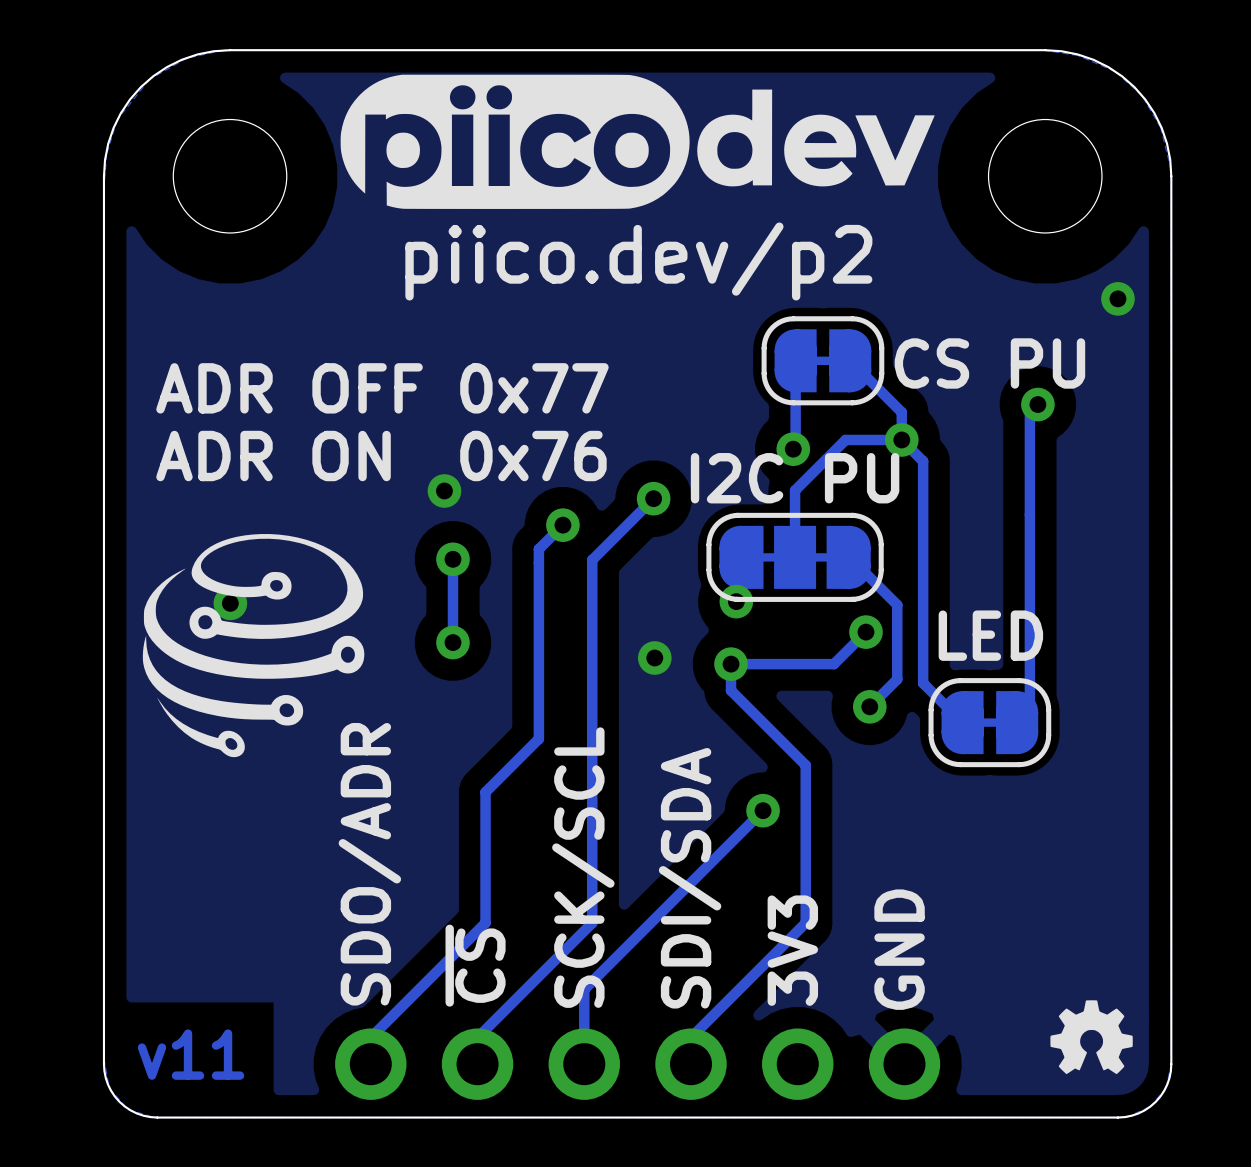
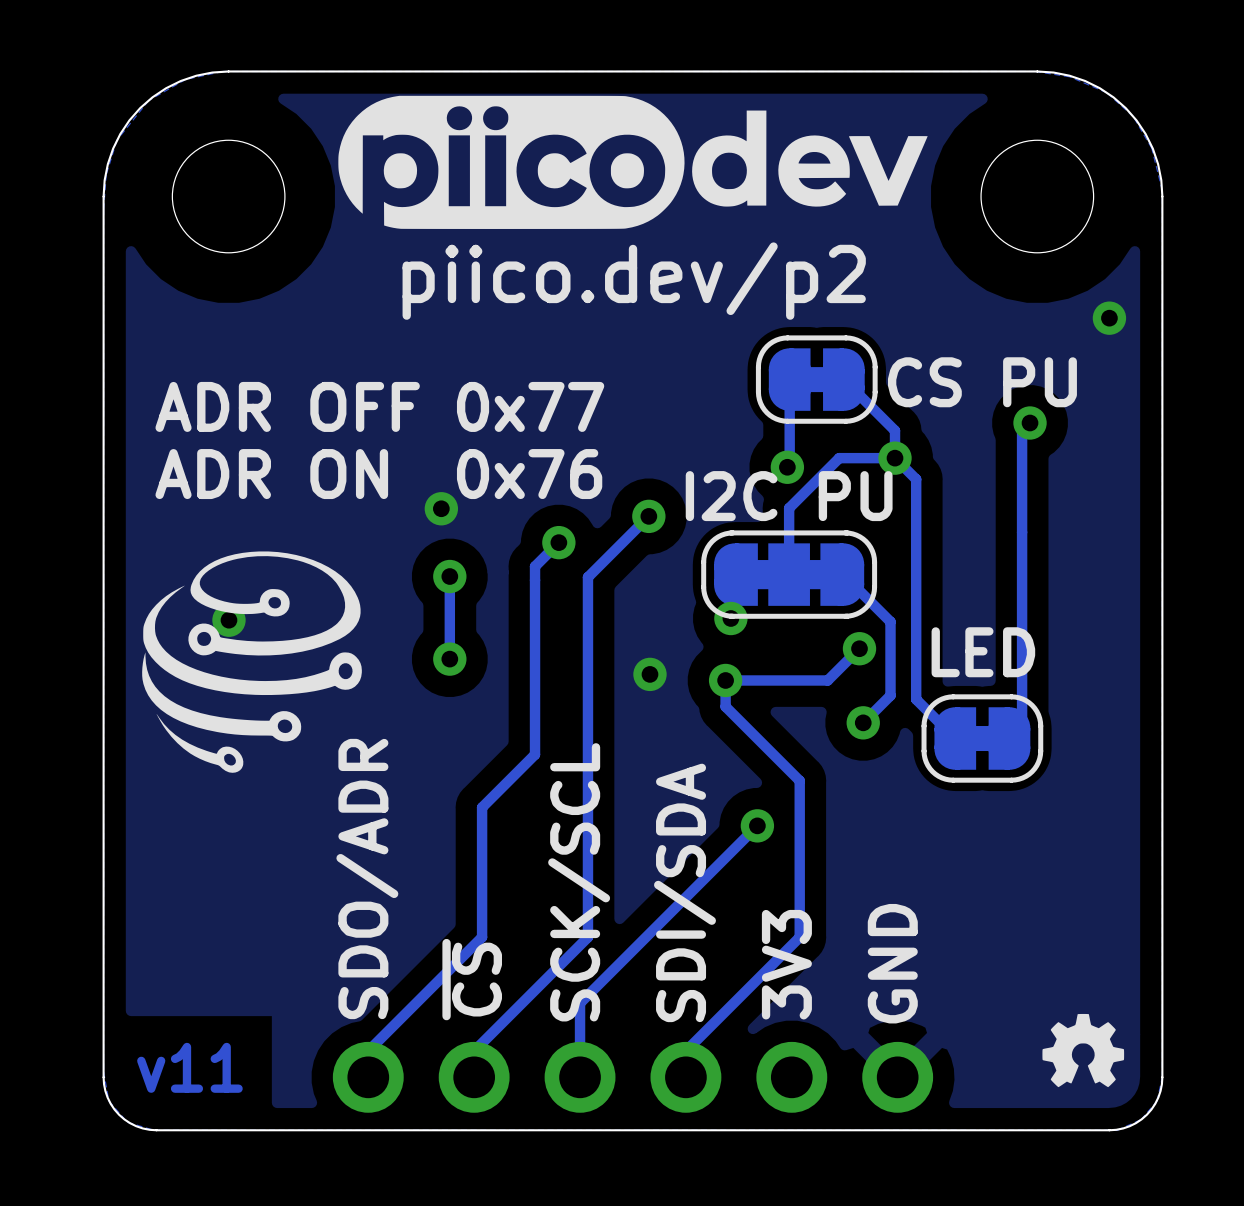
part footprint: [761, 316, 885, 406] -> [755, 335, 878, 424]
part footprint: [706, 512, 884, 602] -> [701, 530, 878, 619]
part footprint: [928, 678, 1052, 768] -> [921, 694, 1044, 783]

